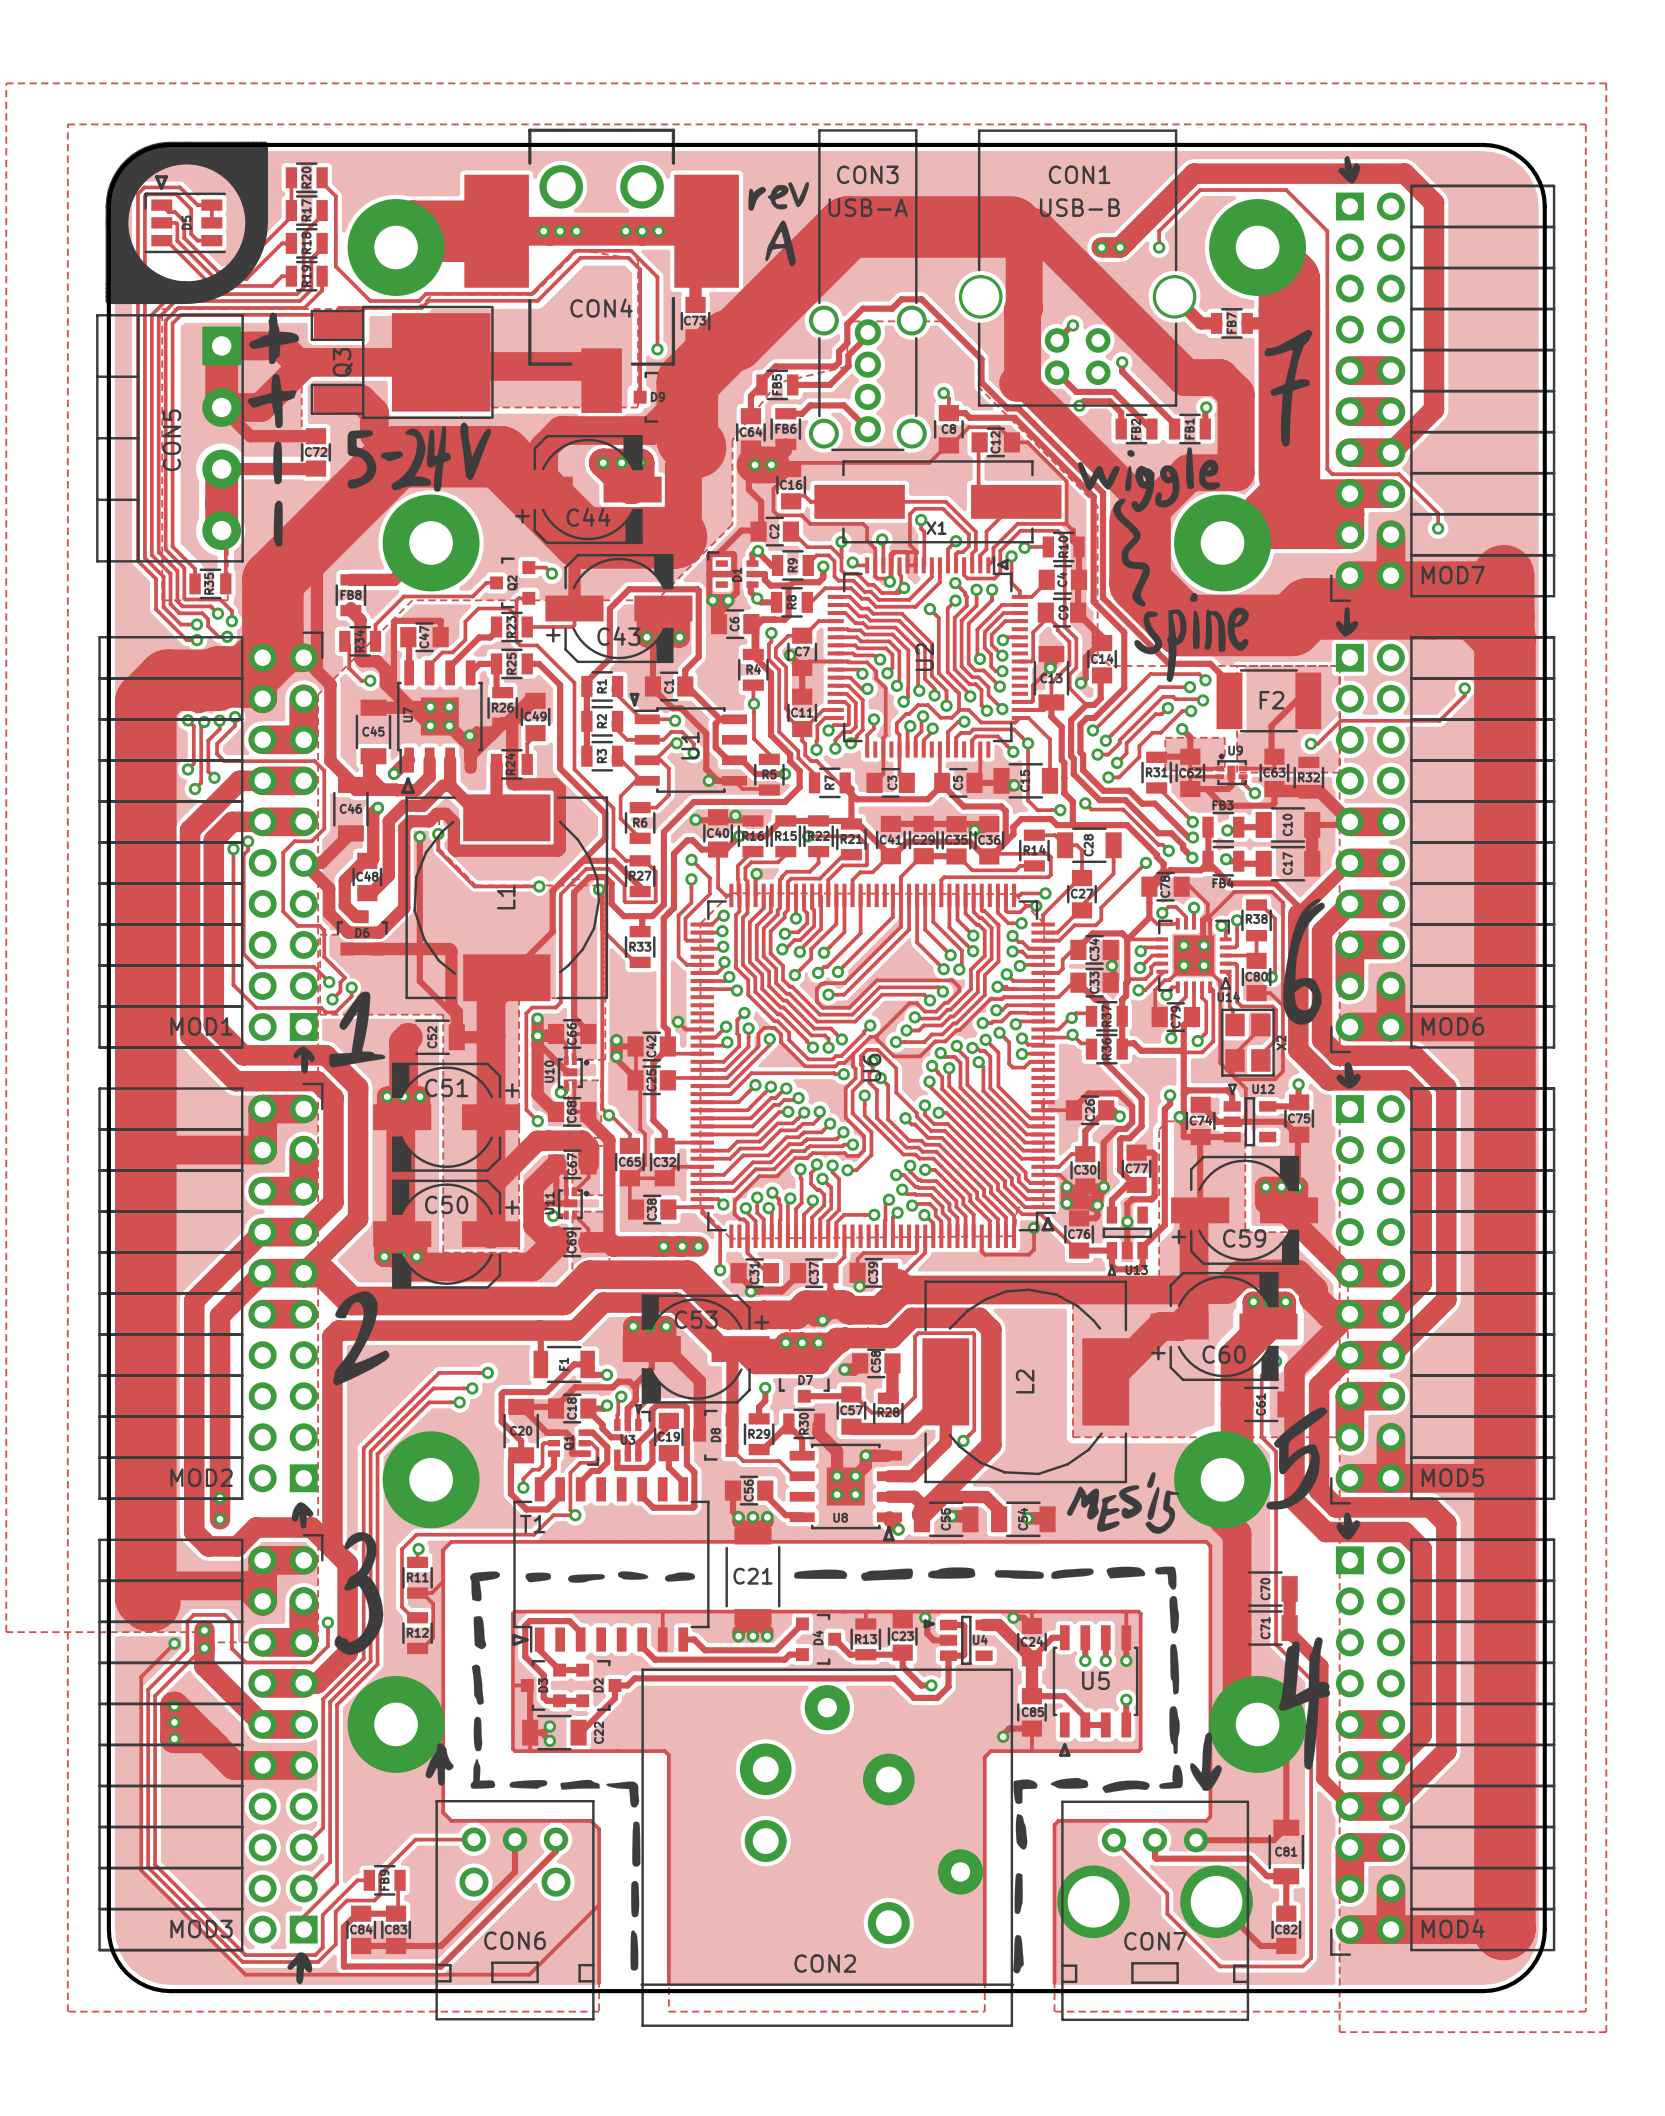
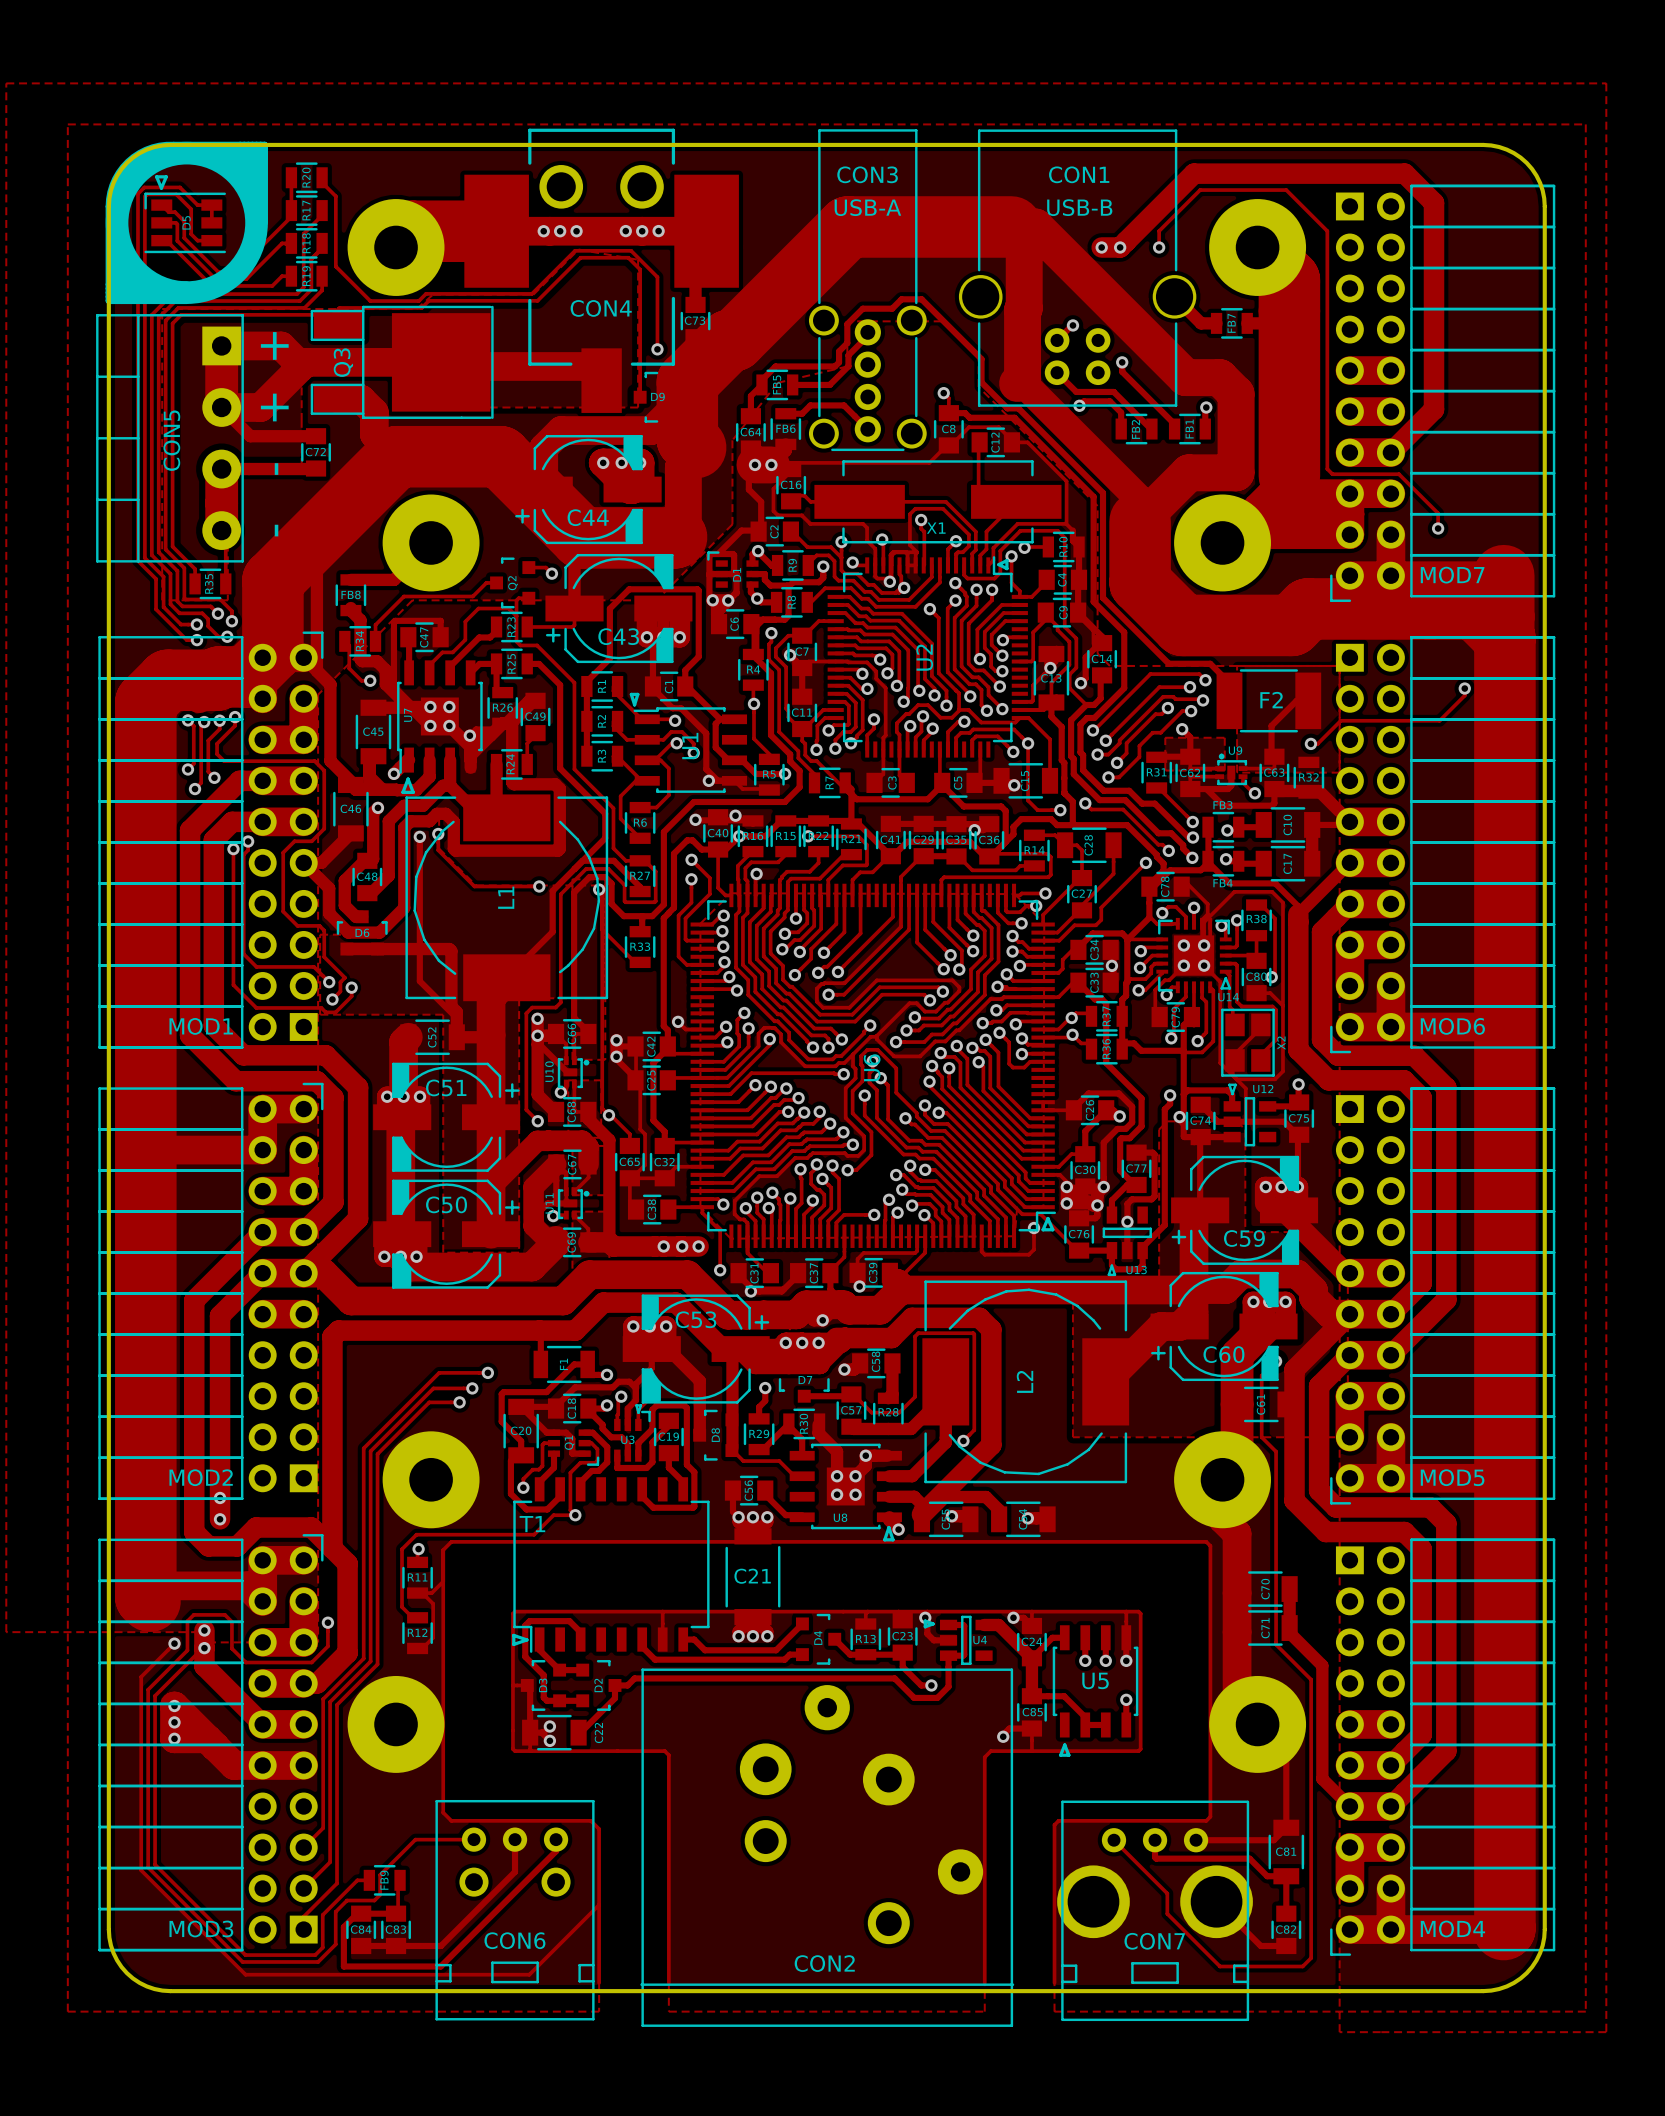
drawing: [247, 156, 1361, 1985] -> none
CON5 text: none -> + (274, 345)
CON5 text: none -> + (274, 407)
CON5 text: none -> - (276, 469)
CON5 text: none -> - (276, 530)

